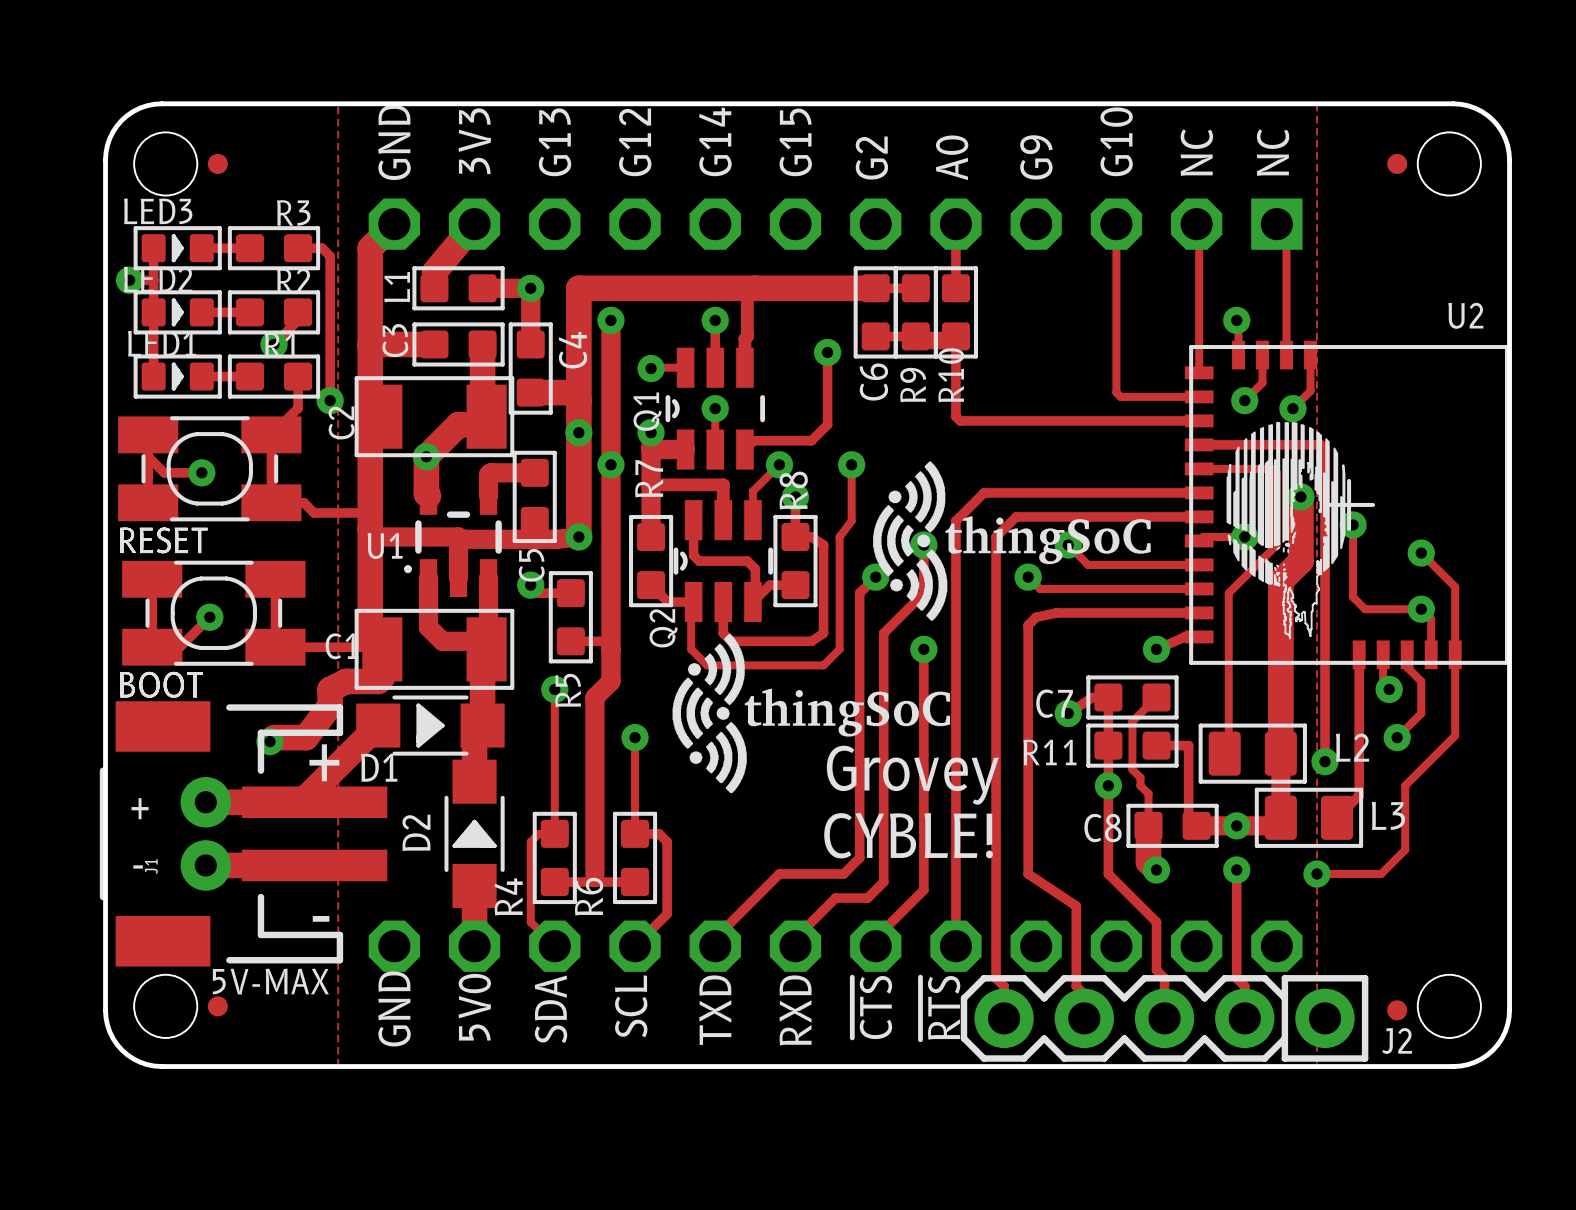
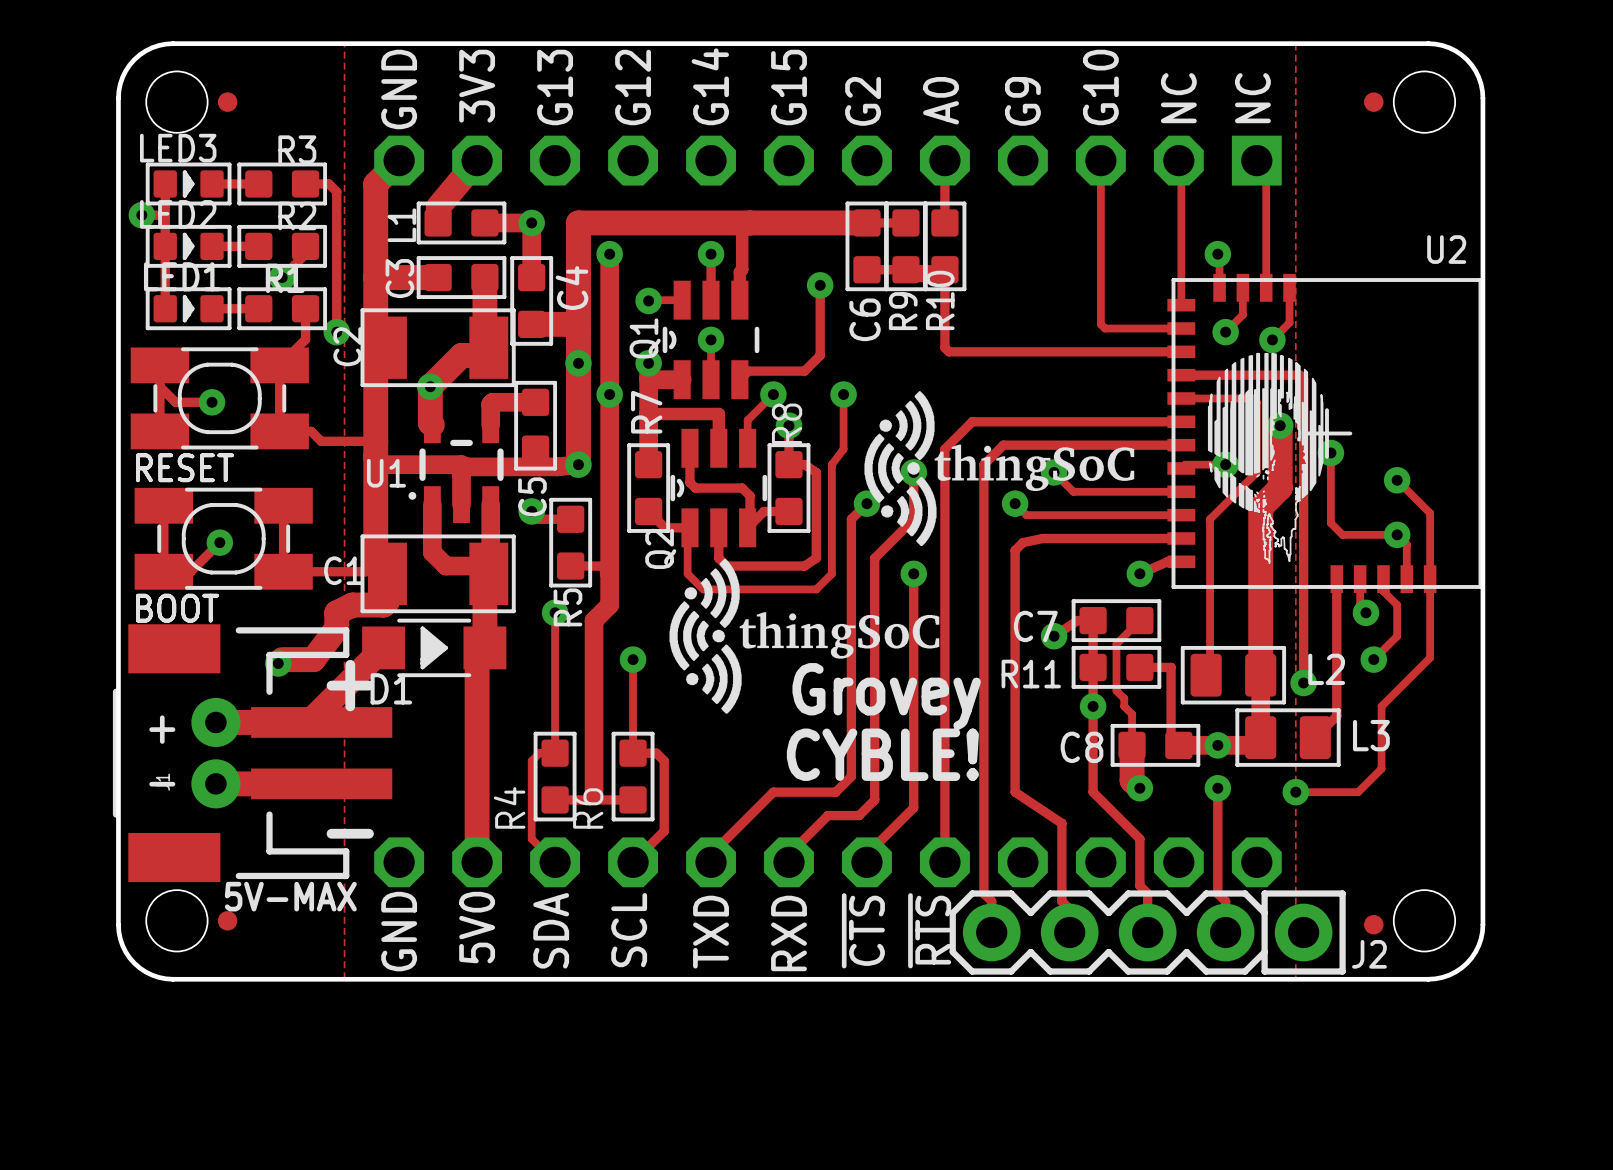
track: none -> (477, 702) (477, 803)
D2: (474, 833) -> none

